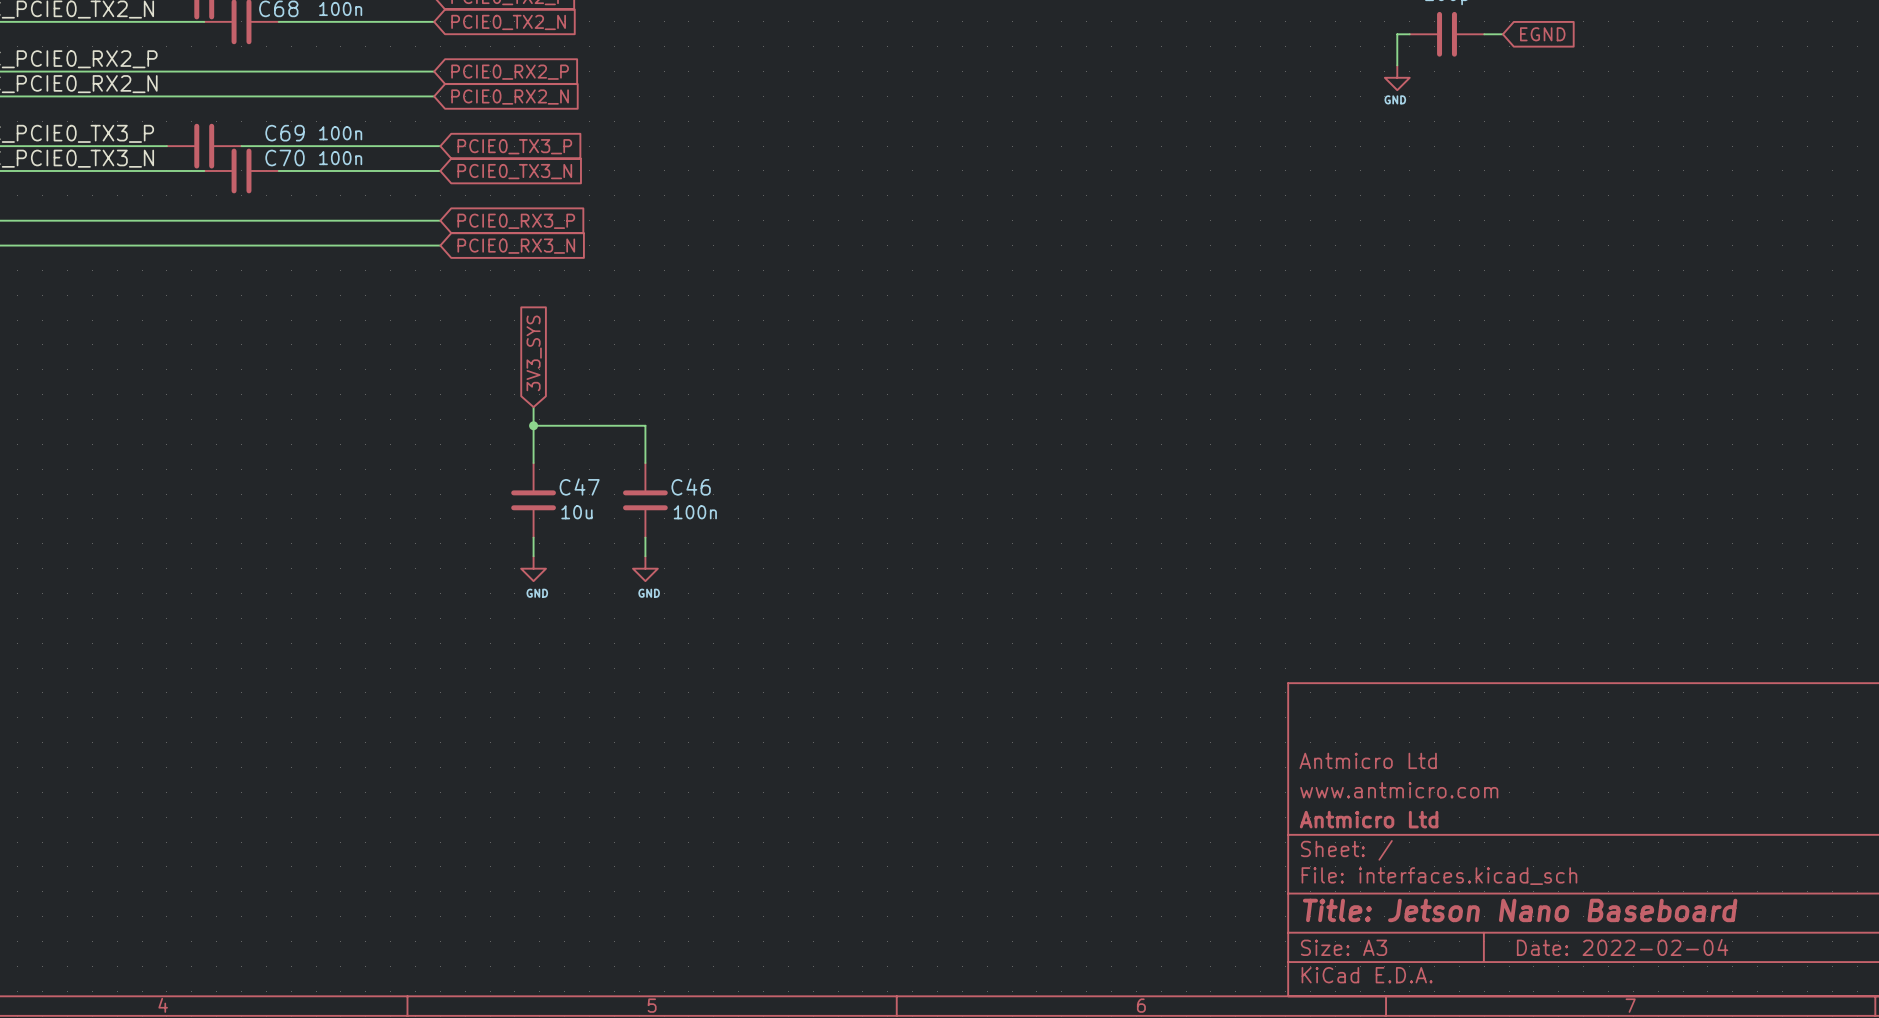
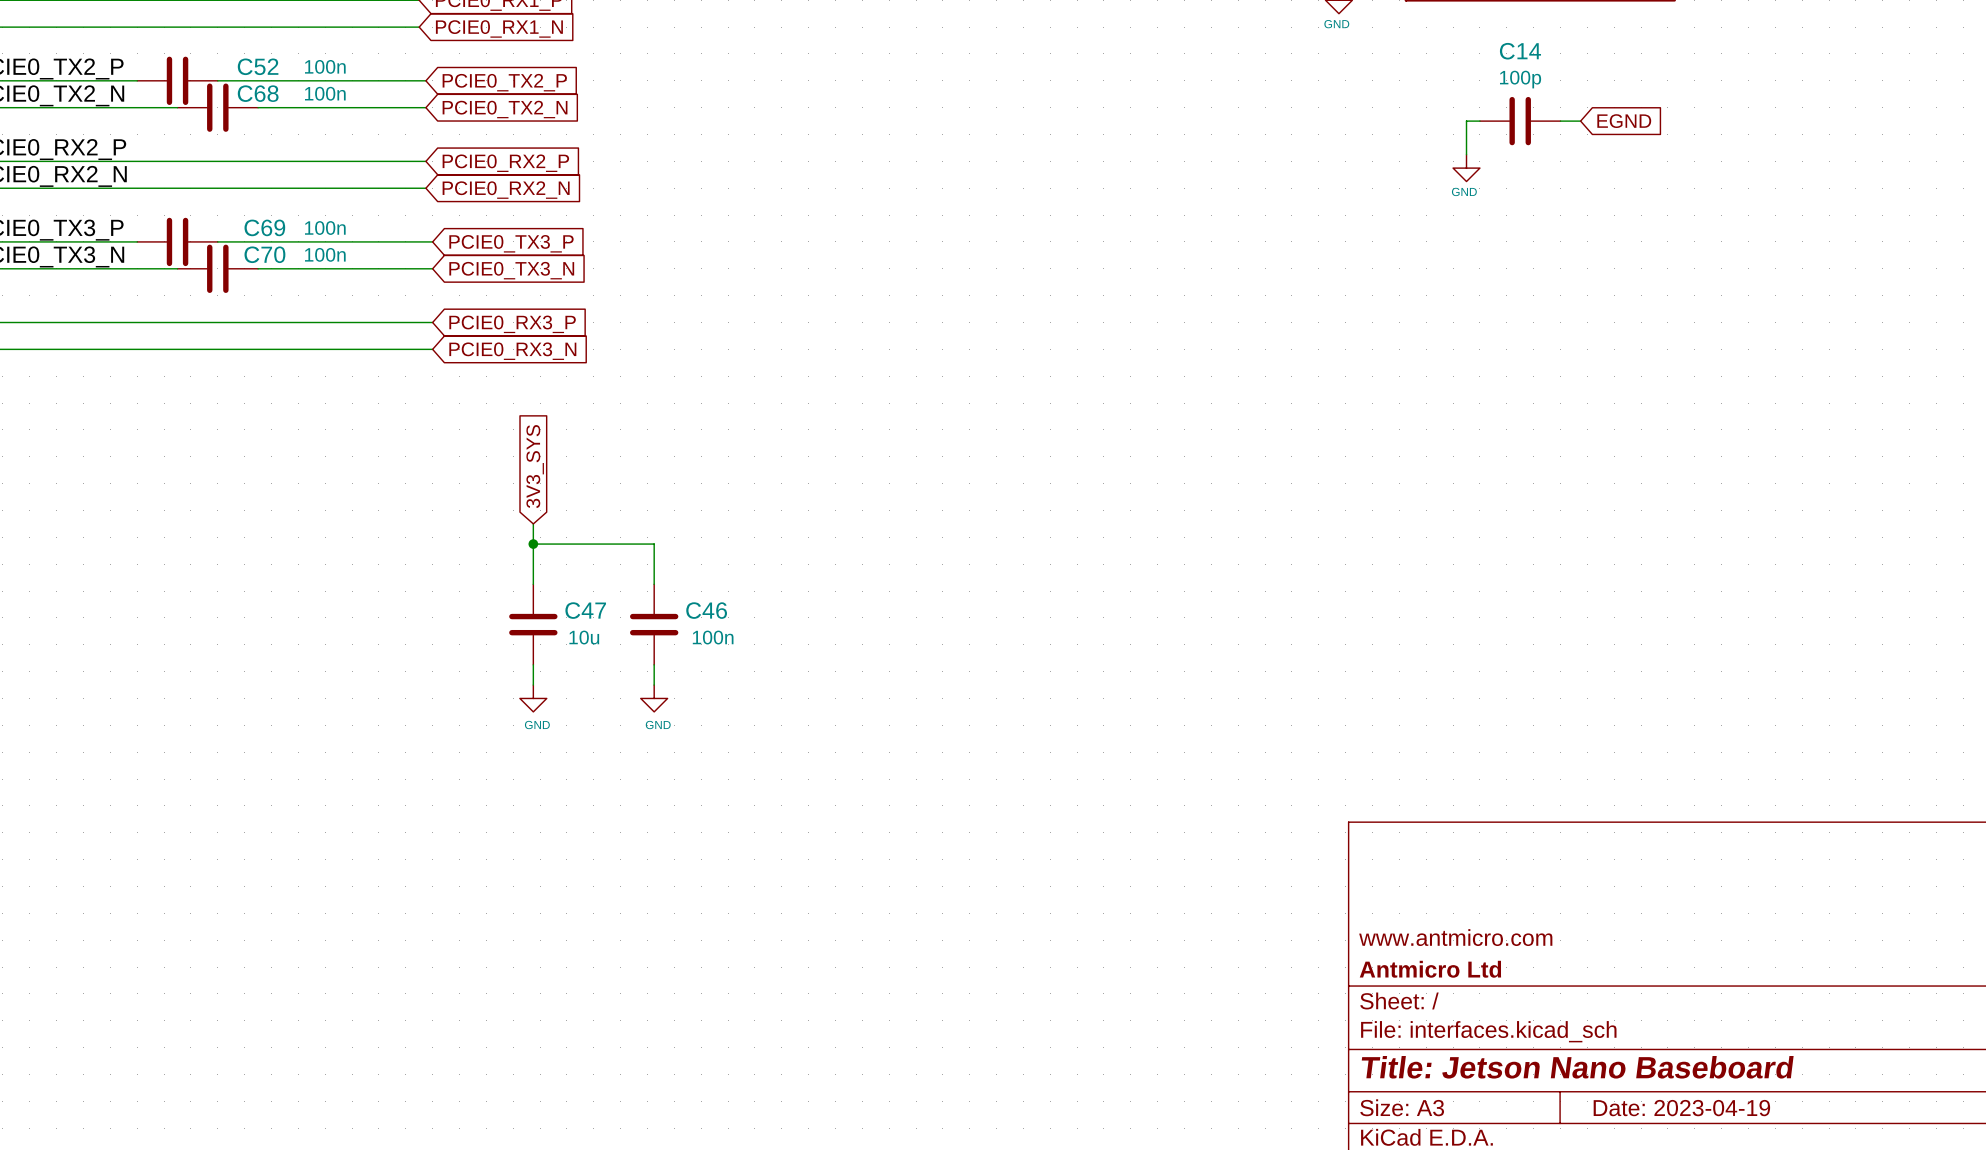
title block: Antmicro Ltd (1368, 760) -> none
title block: Date: 2022-02-04 (1622, 947) -> Date: 2023-04-19 (1681, 1108)

